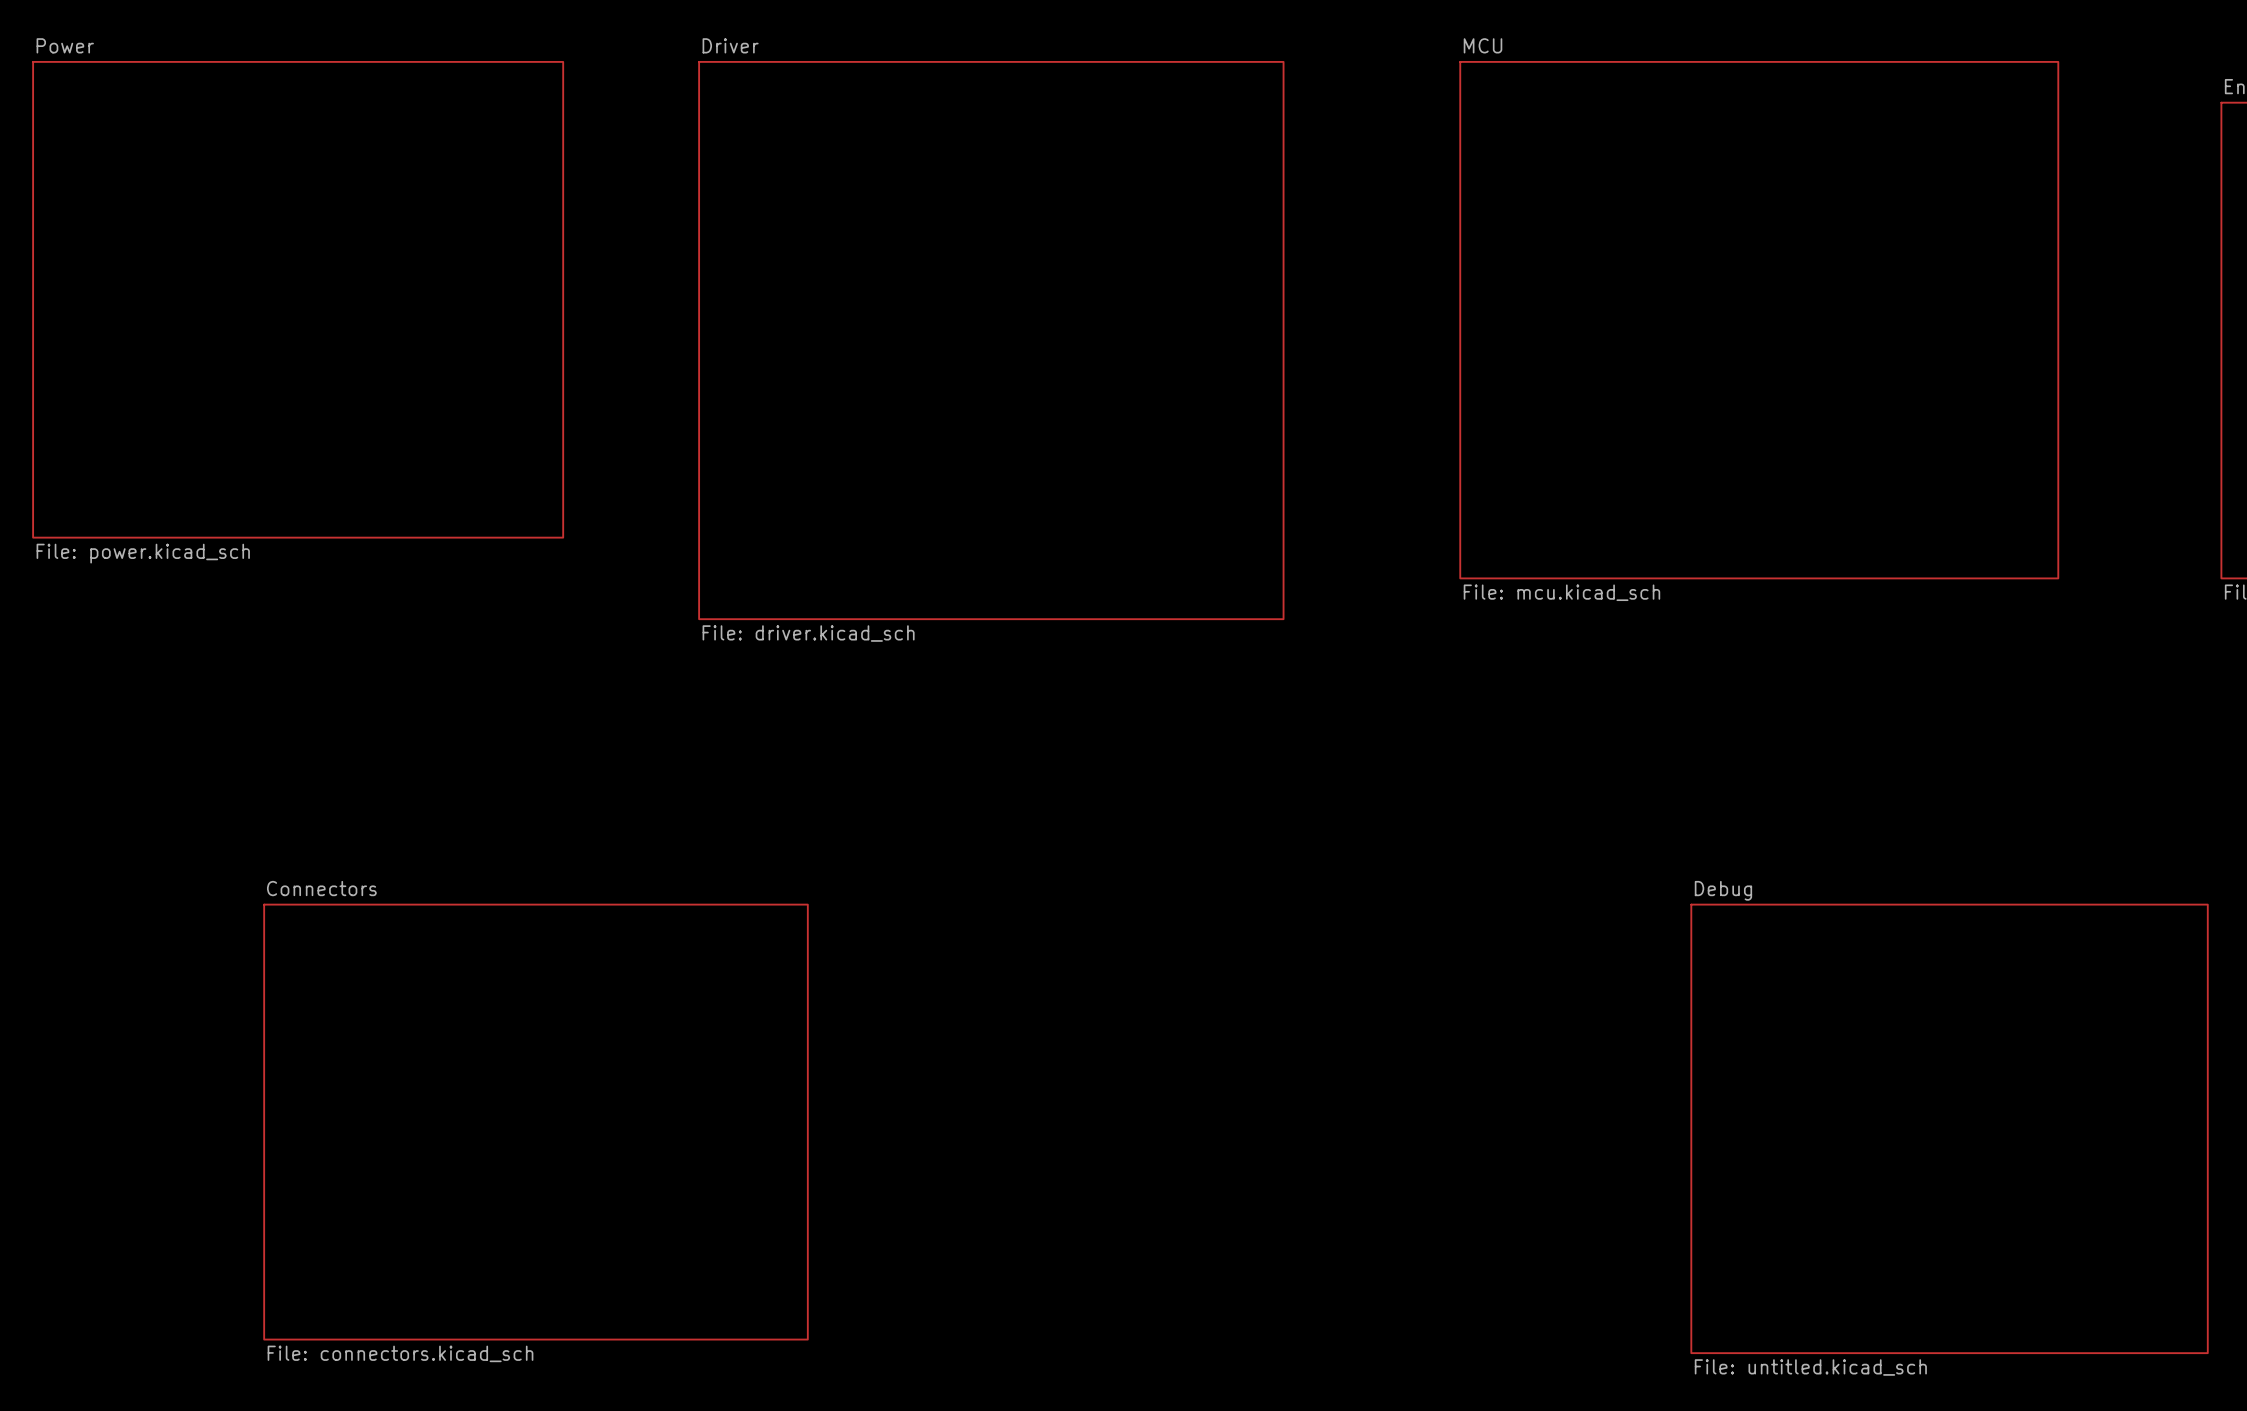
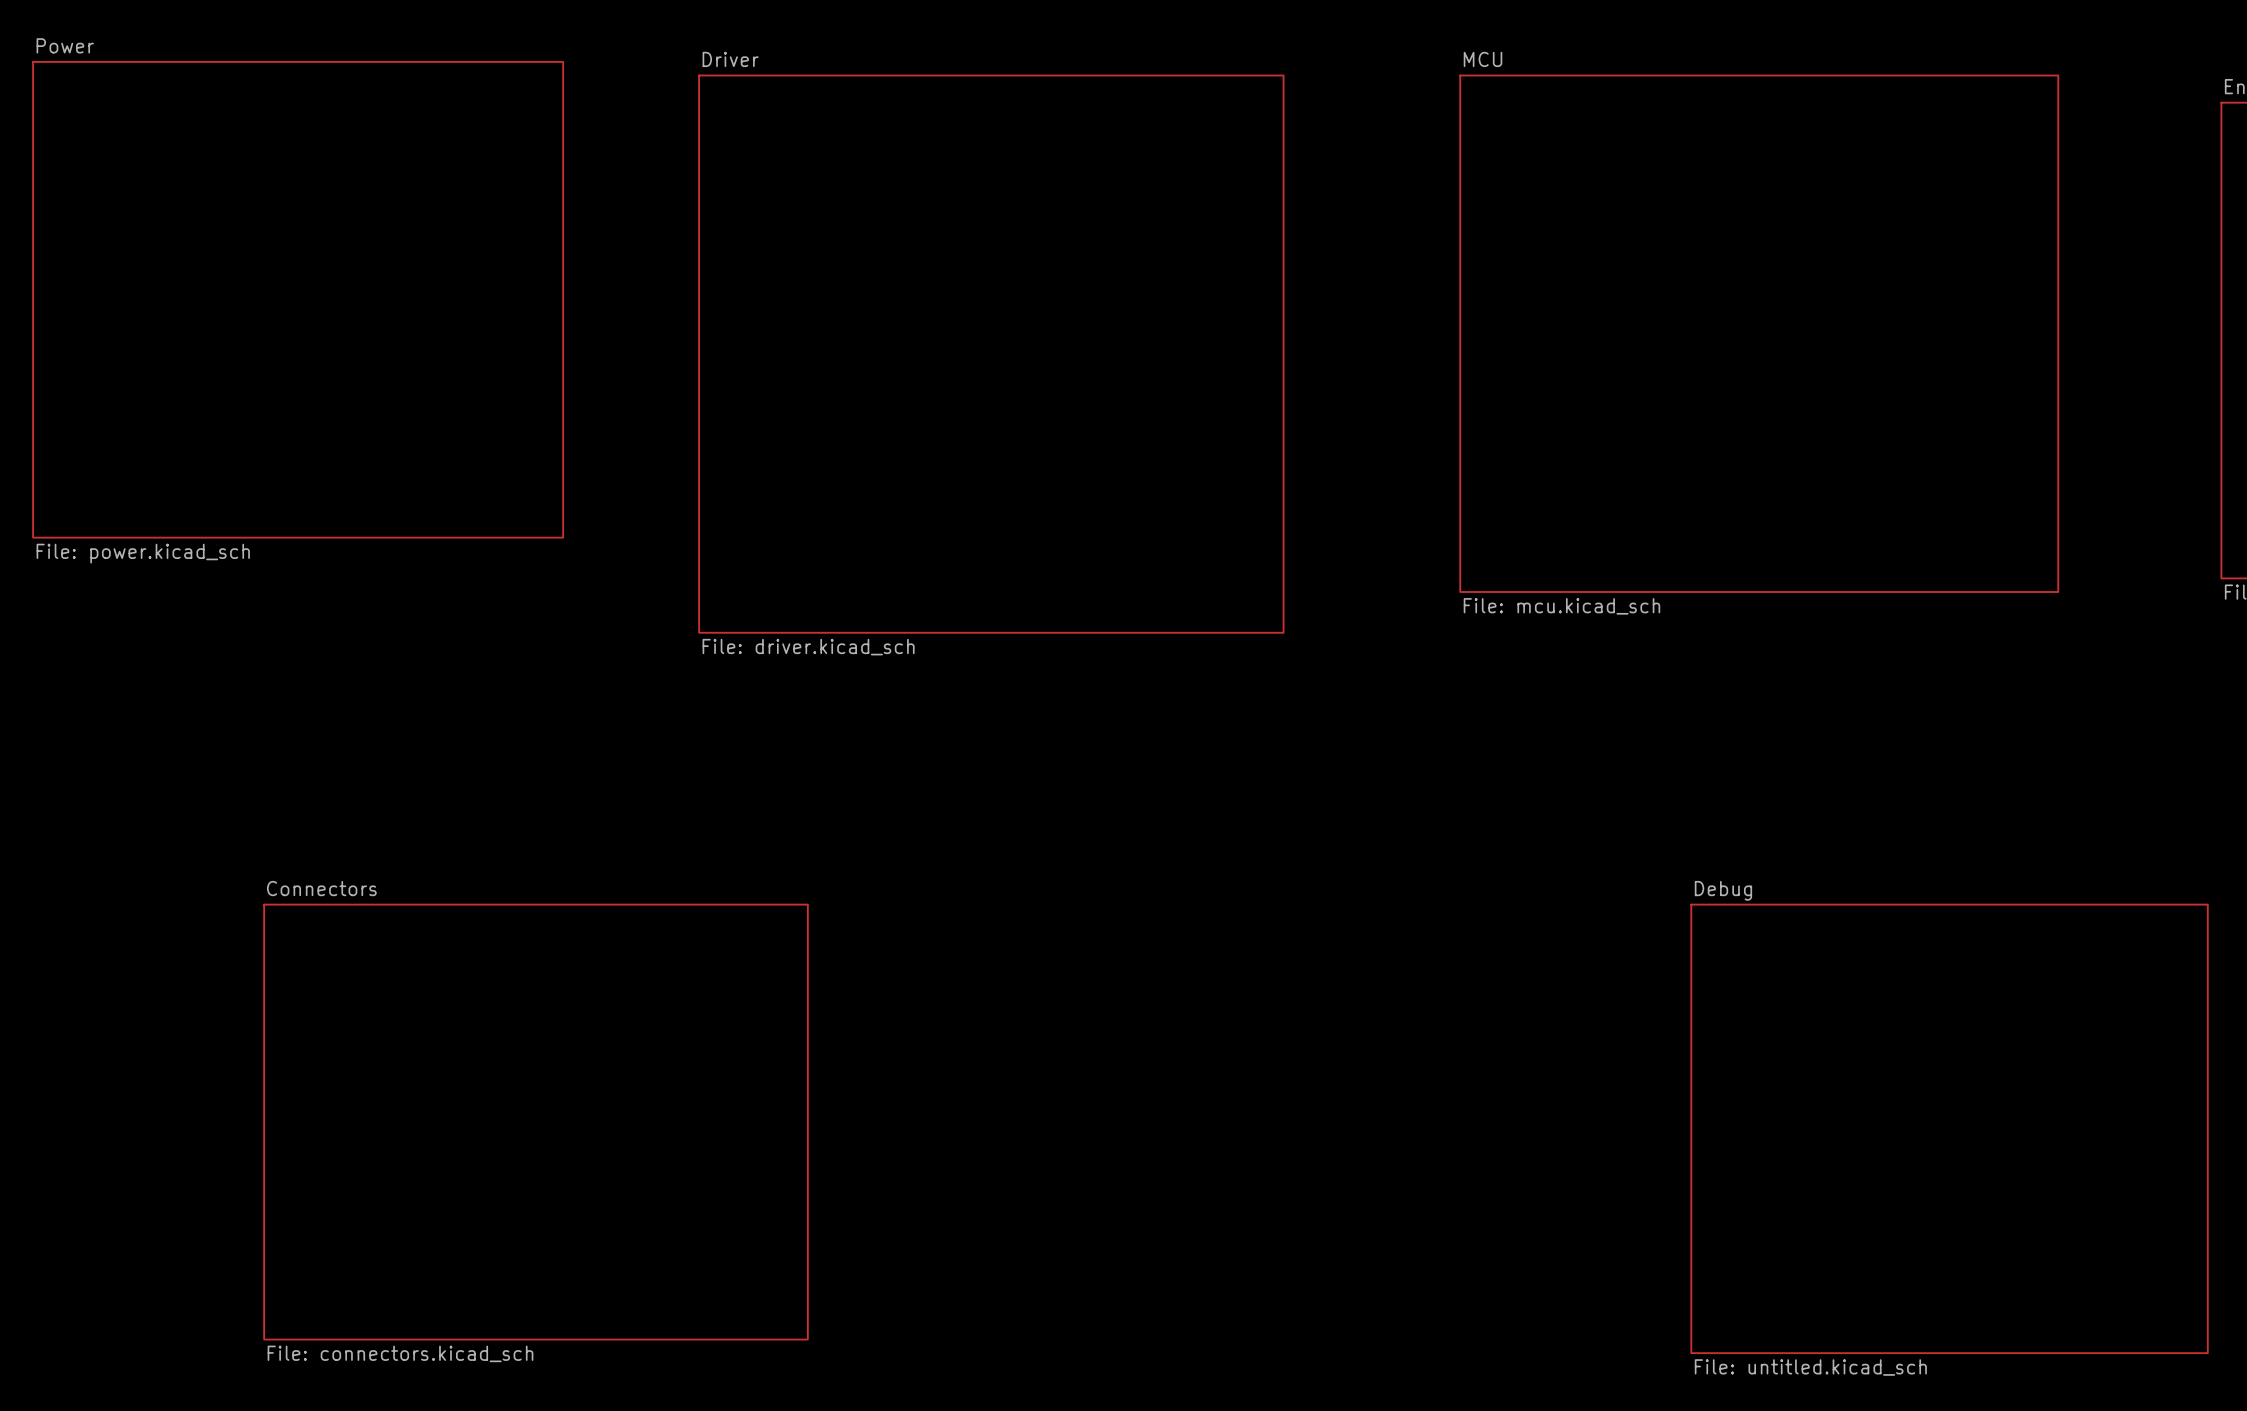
sheet MCU position: (1759, 320) -> (1759, 333)
sheet Driver position: (991, 340) -> (991, 354)

